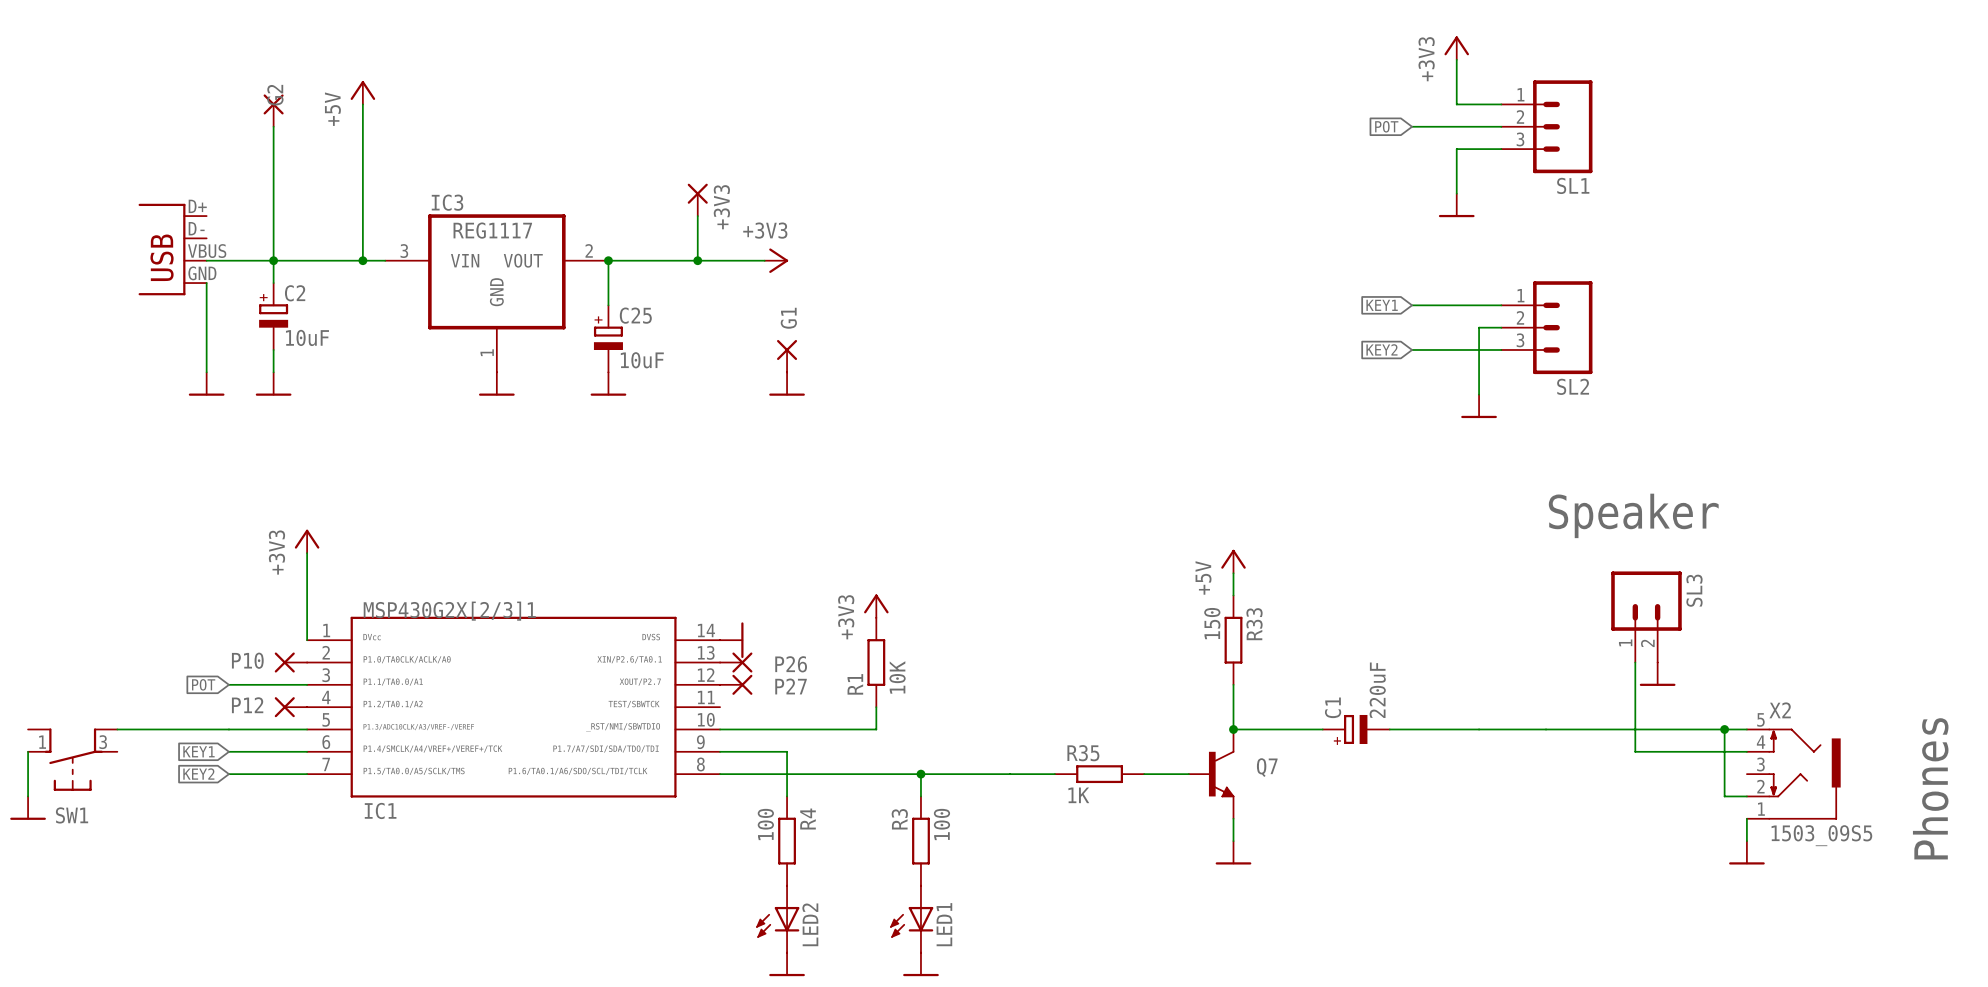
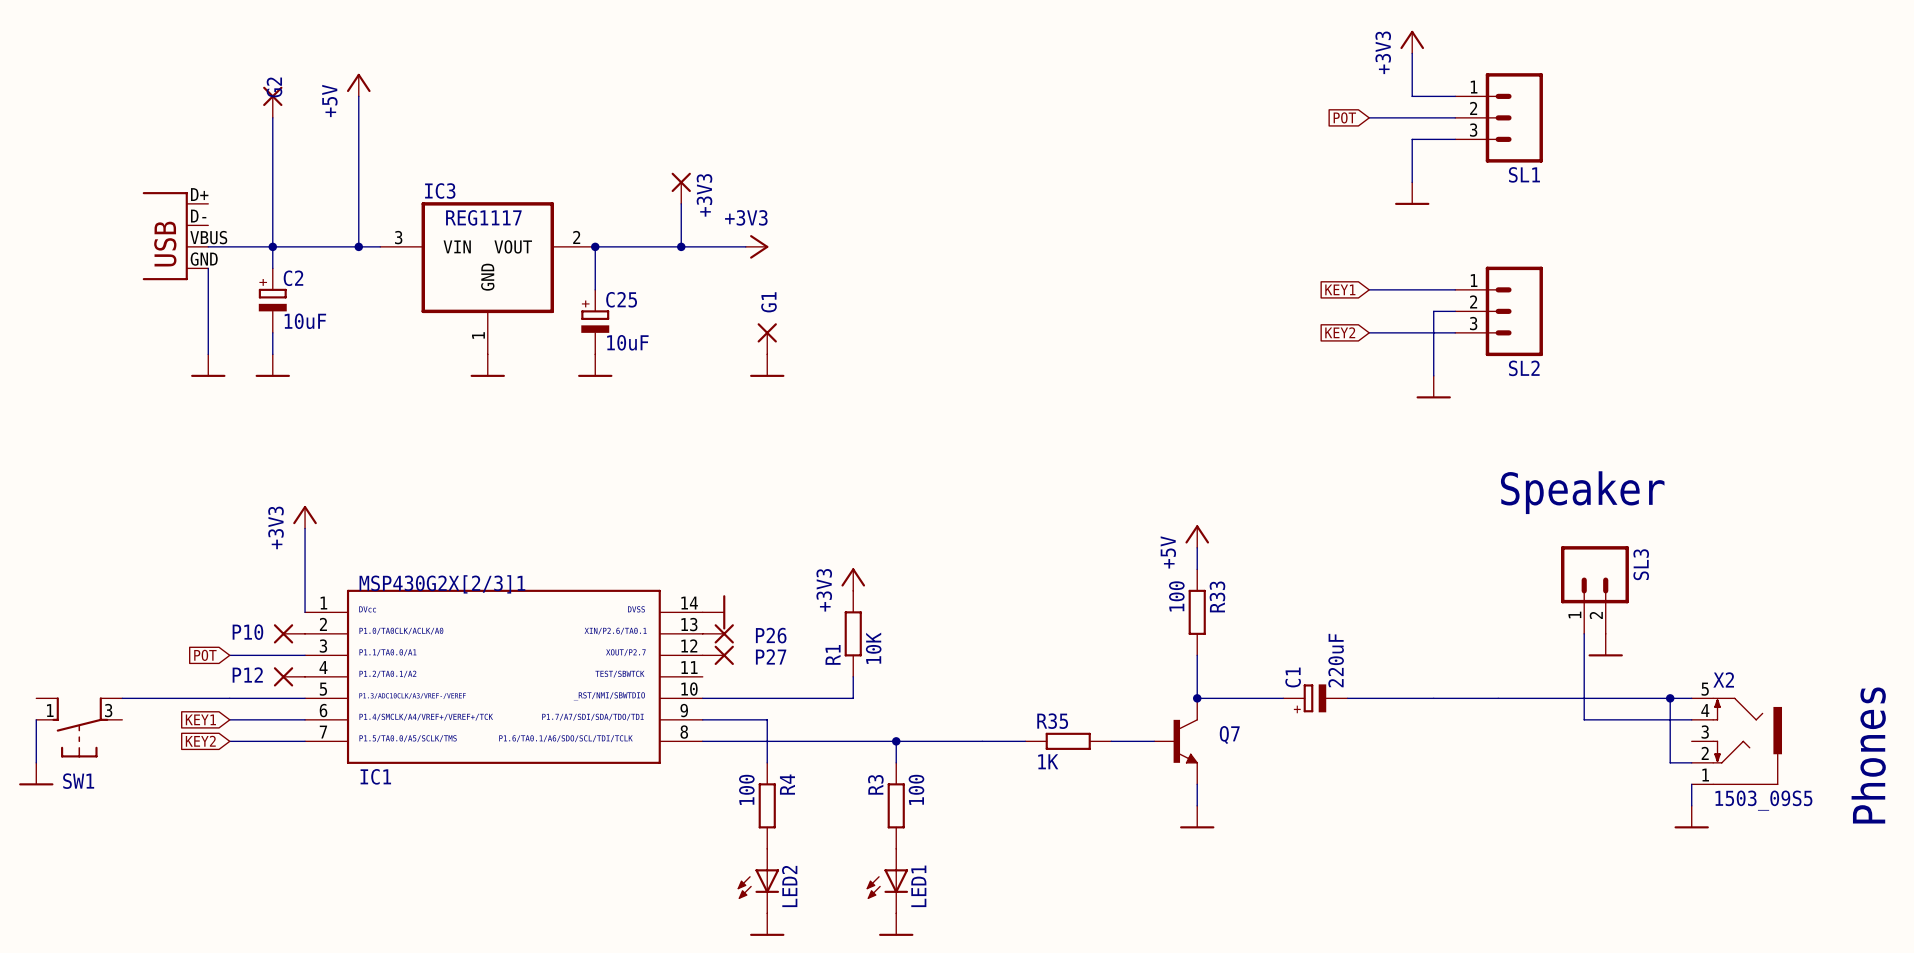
R33 value: 150 (1212, 623) -> 100 (1176, 596)

